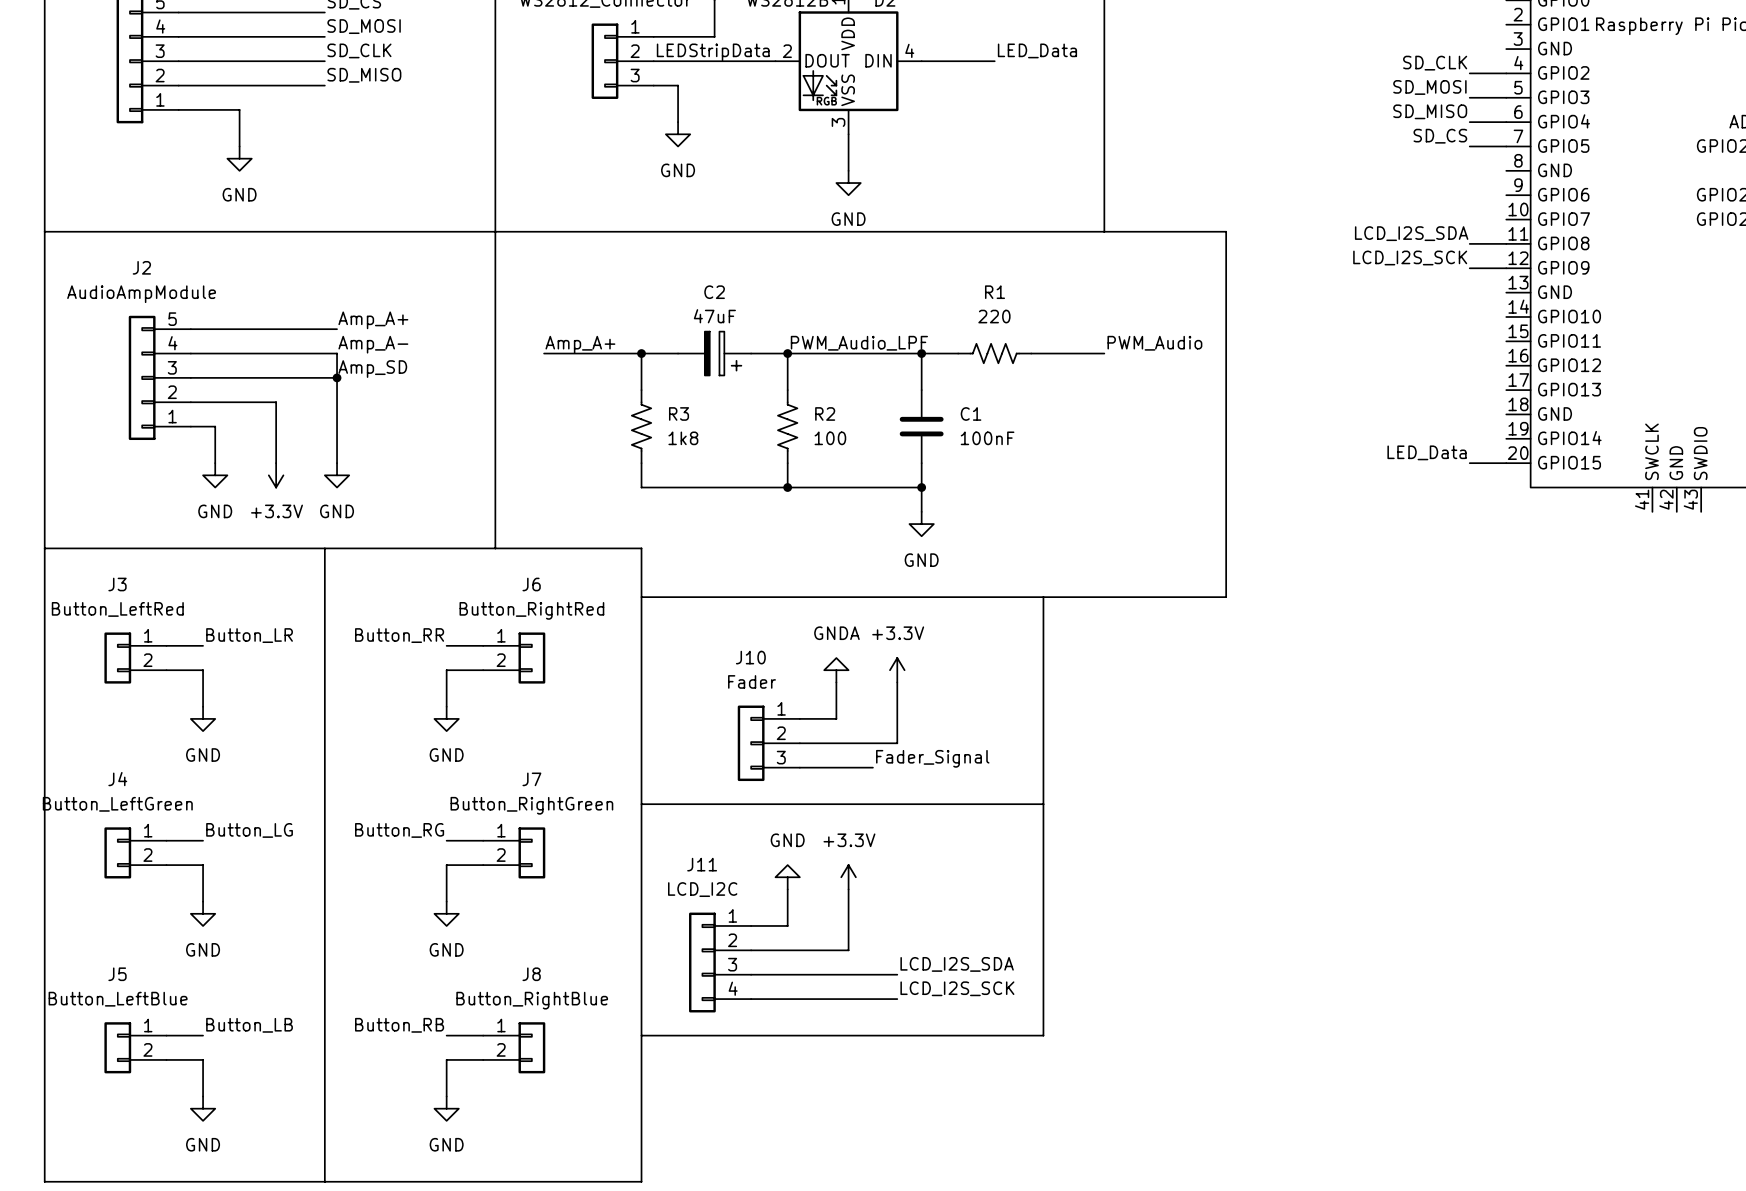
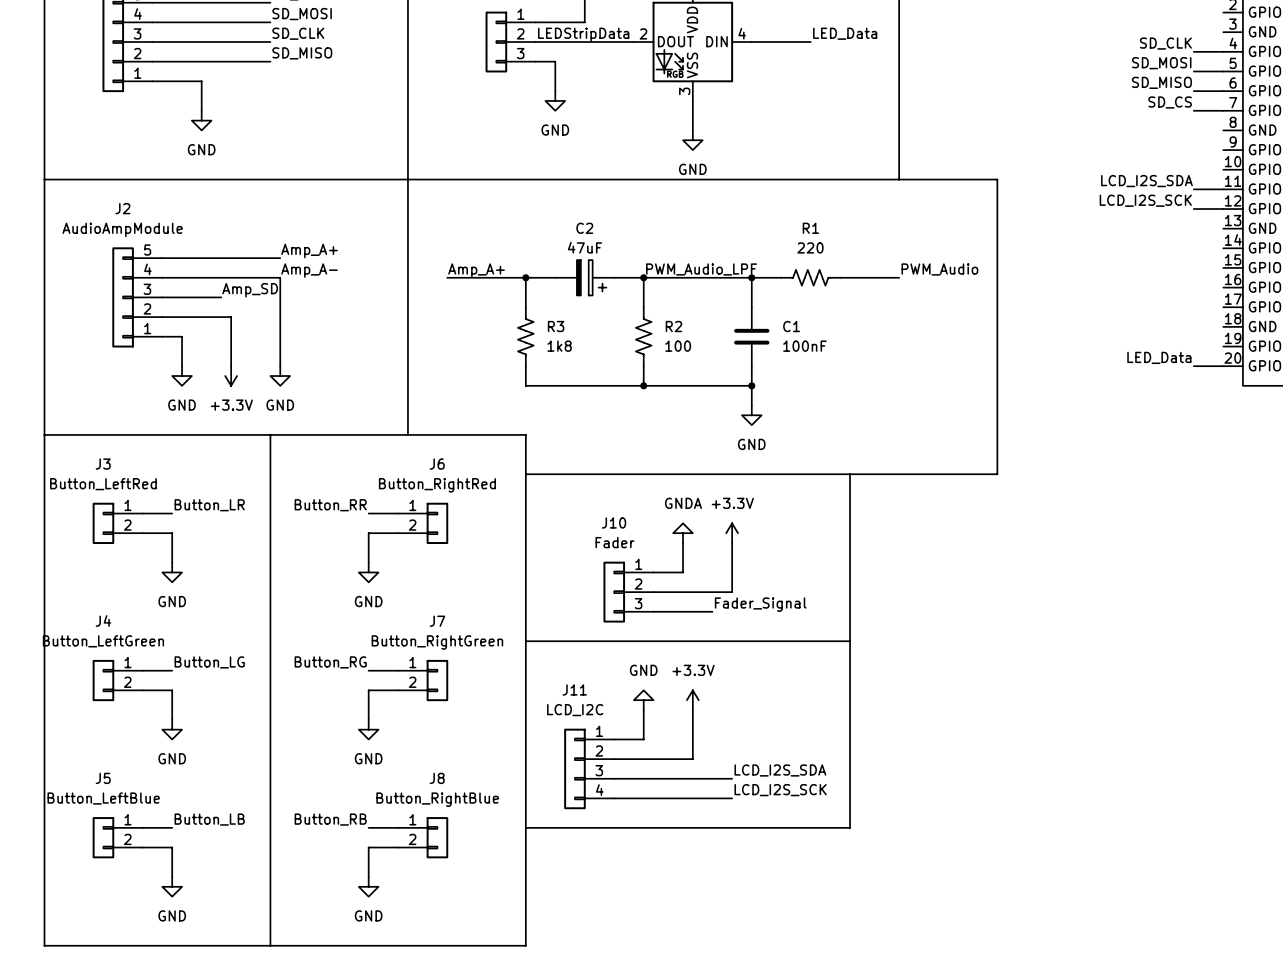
label position: Amp_SD (372, 369) -> Amp_SD (250, 290)
wire: (263, 377) (337, 377) -> none
junction: (337, 377) -> none

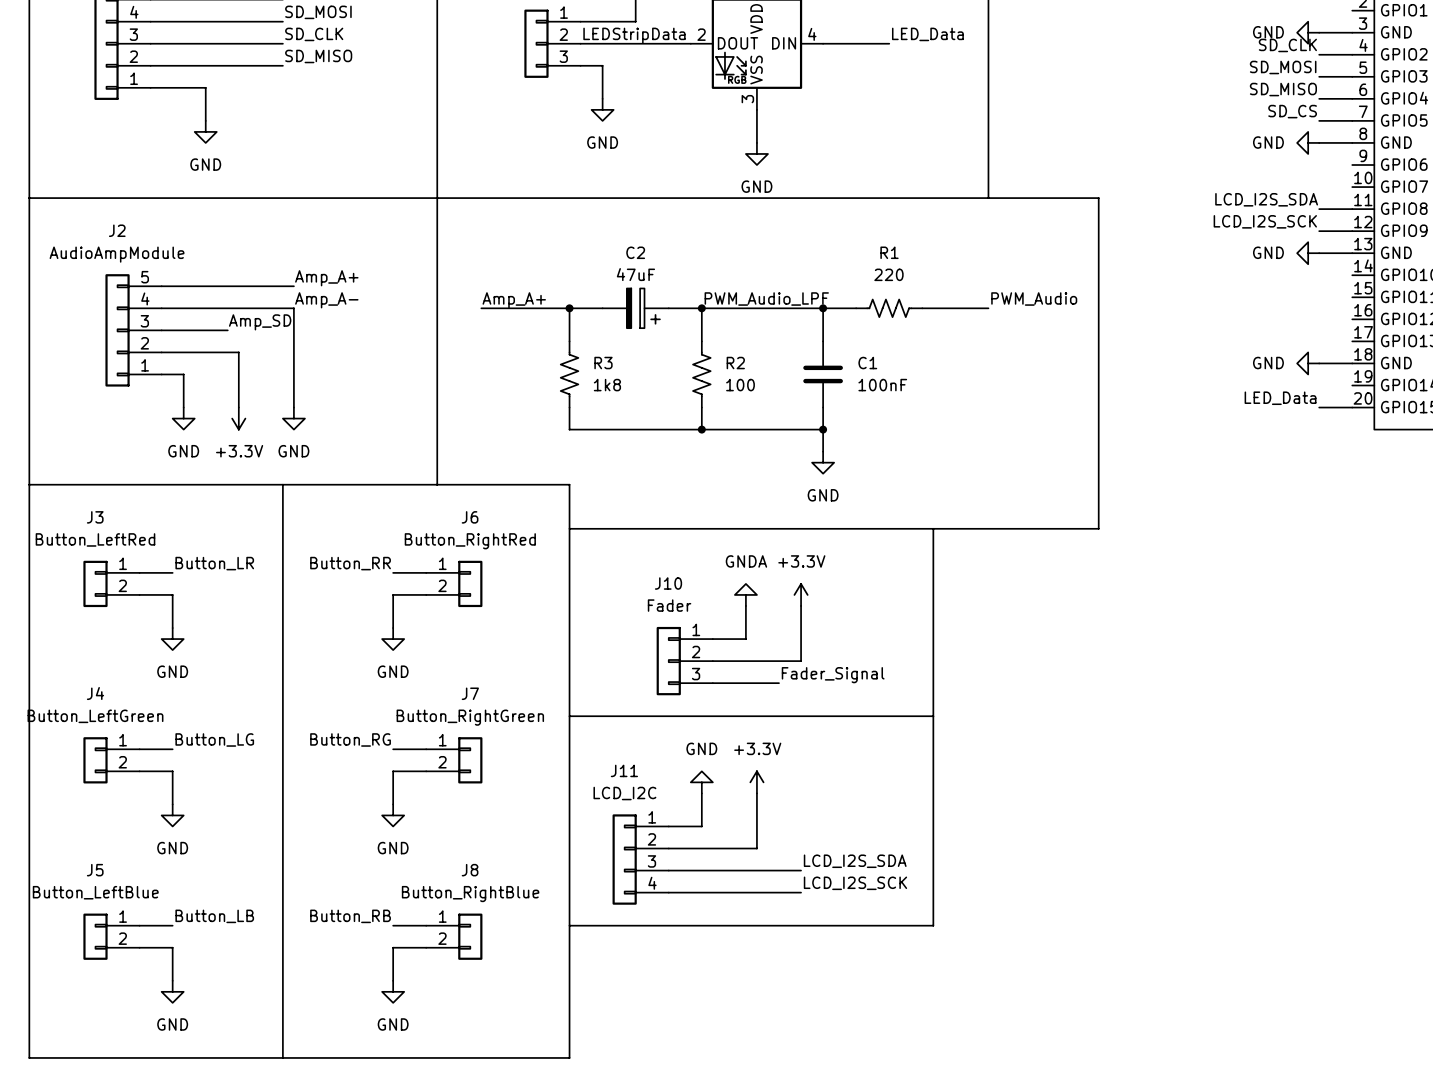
power symbol: none -> GND (1308, 32)
wire: none -> (1319, 32) (1352, 32)
power symbol: none -> GND (1308, 142)
wire: none -> (1319, 142) (1352, 142)
power symbol: none -> GND (1308, 253)
wire: none -> (1319, 253) (1352, 253)
power symbol: none -> GND (1308, 363)
wire: none -> (1319, 363) (1352, 363)

